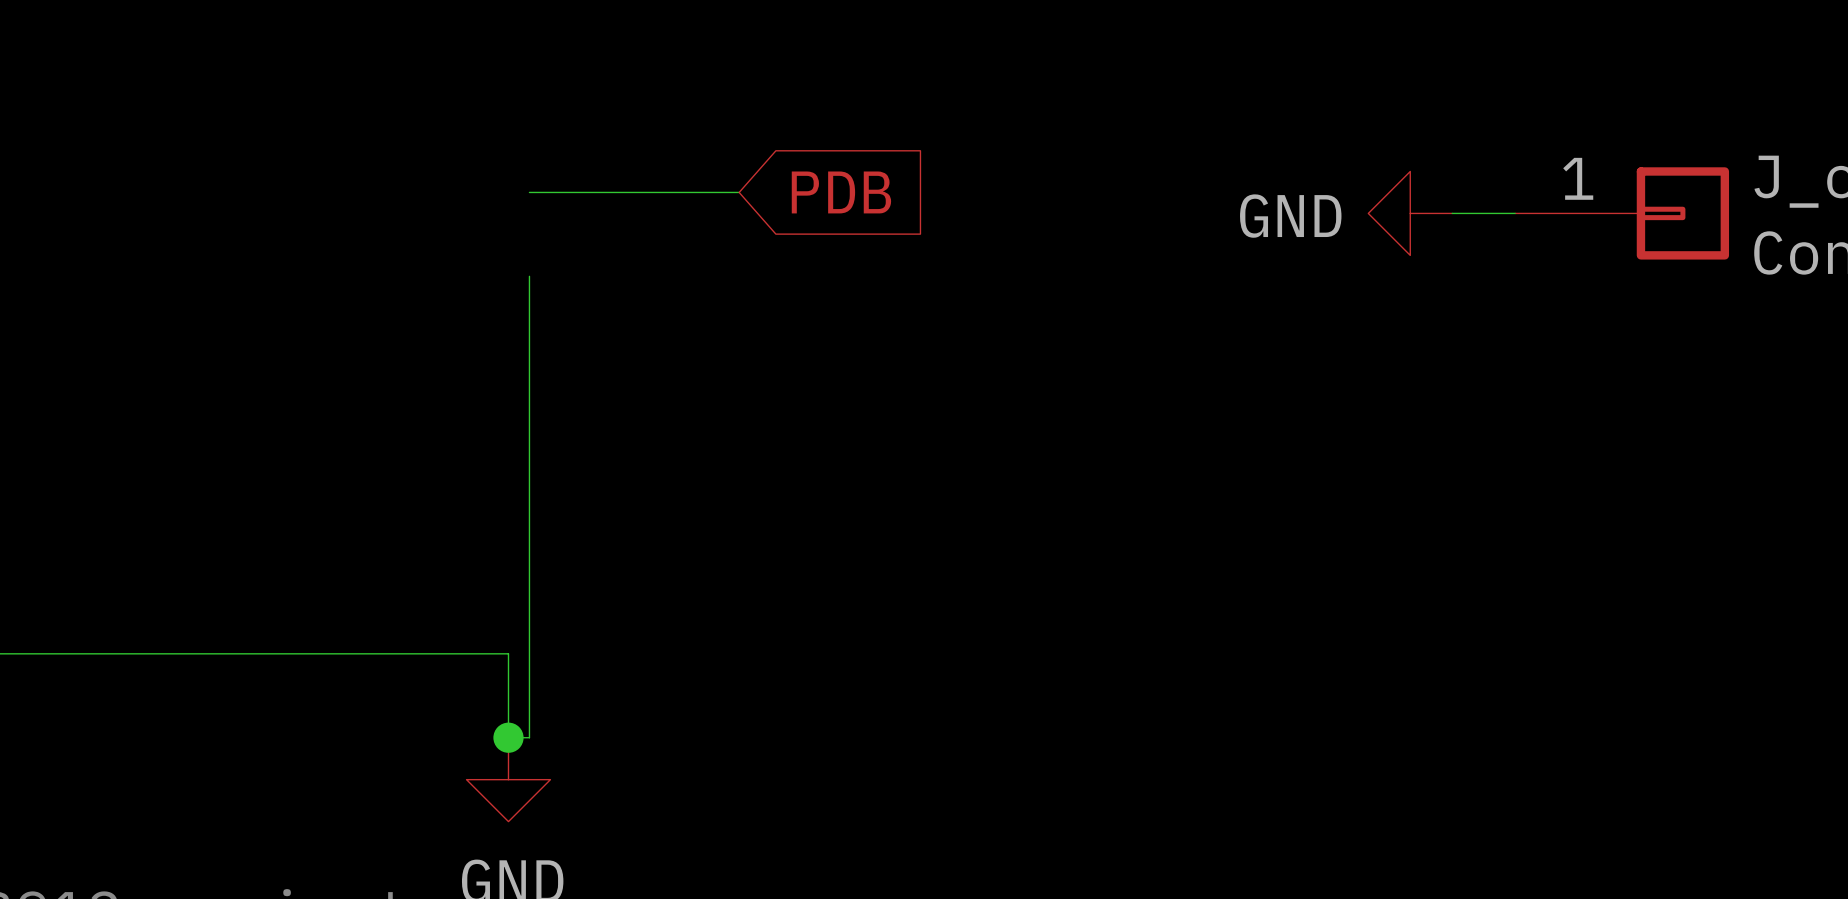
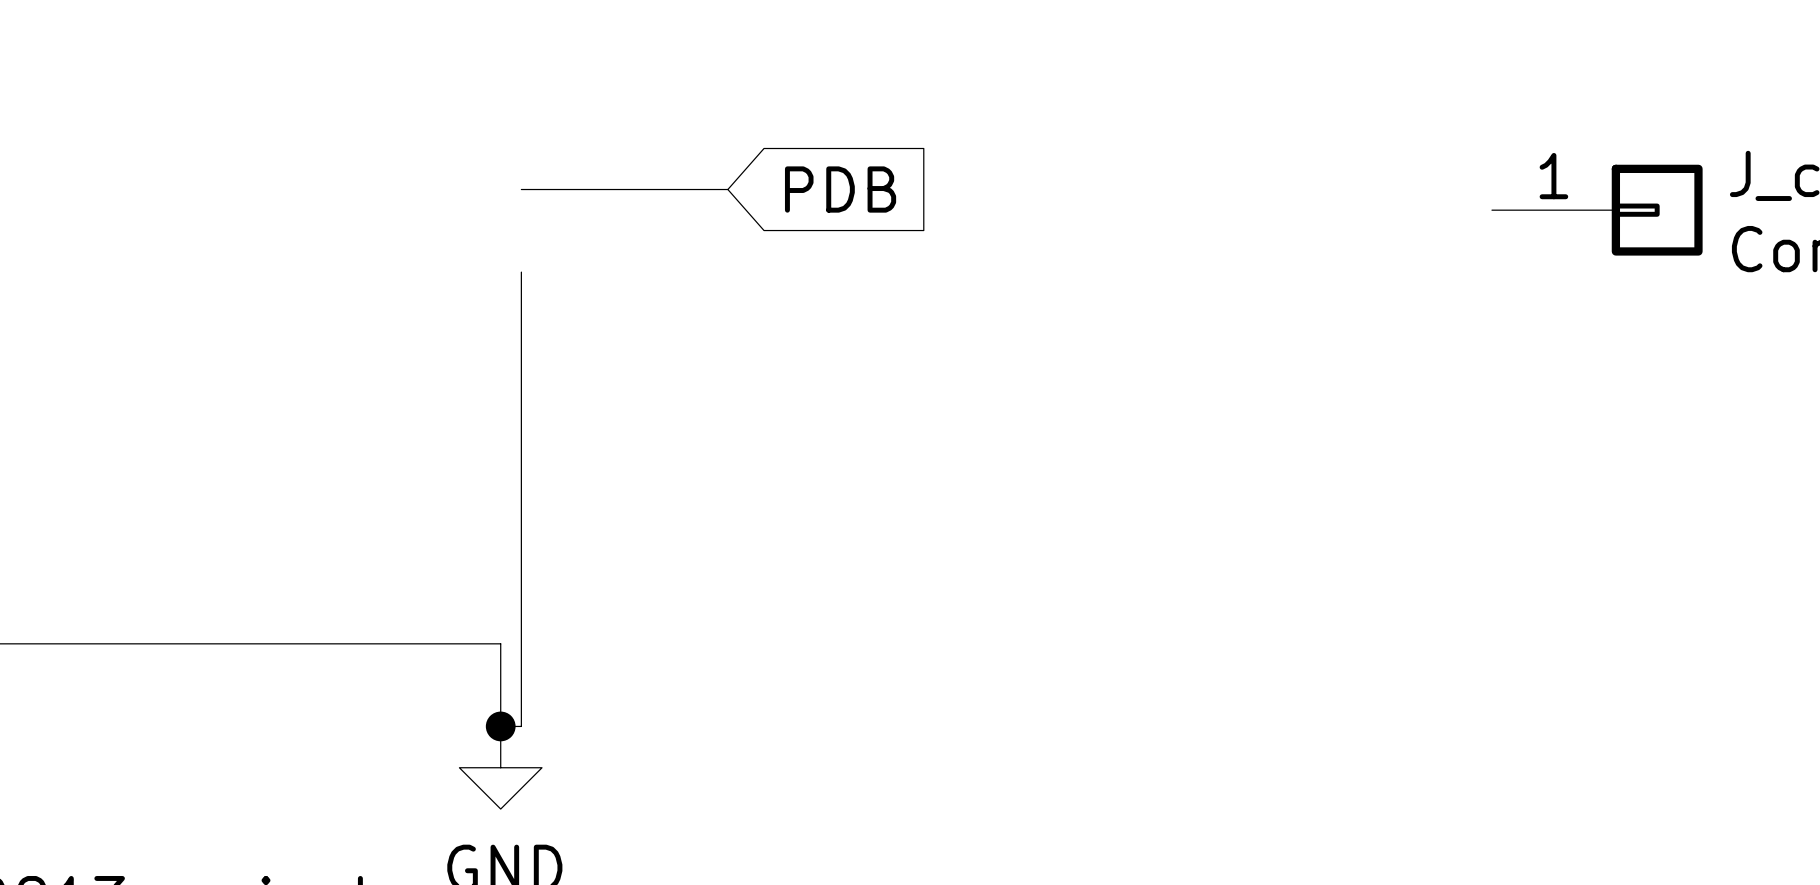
power symbol: GND (1410, 213) -> none
wire: (1452, 213) (1515, 213) -> none

